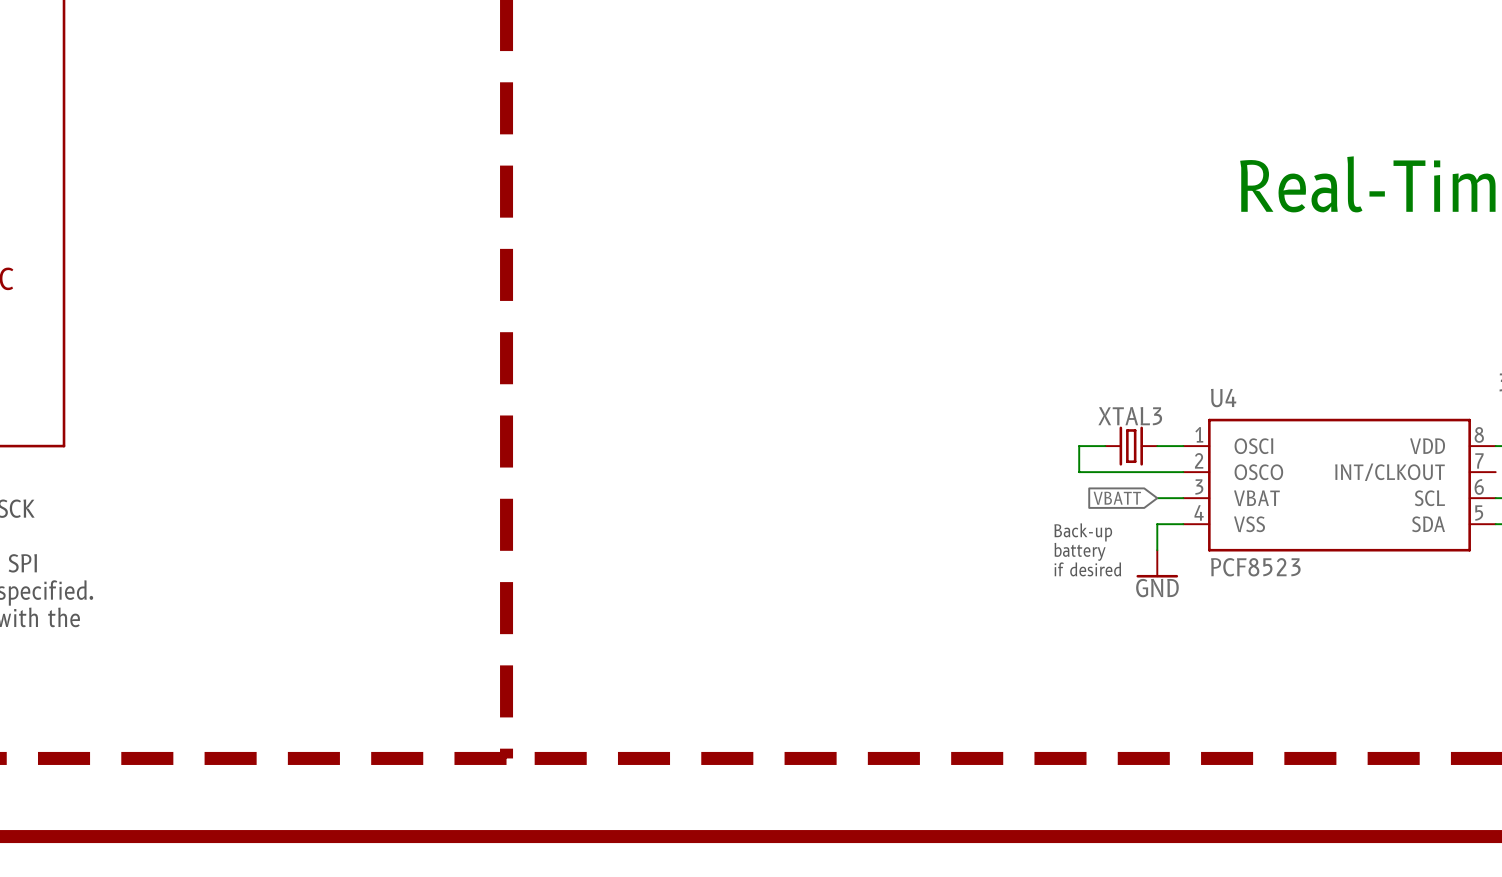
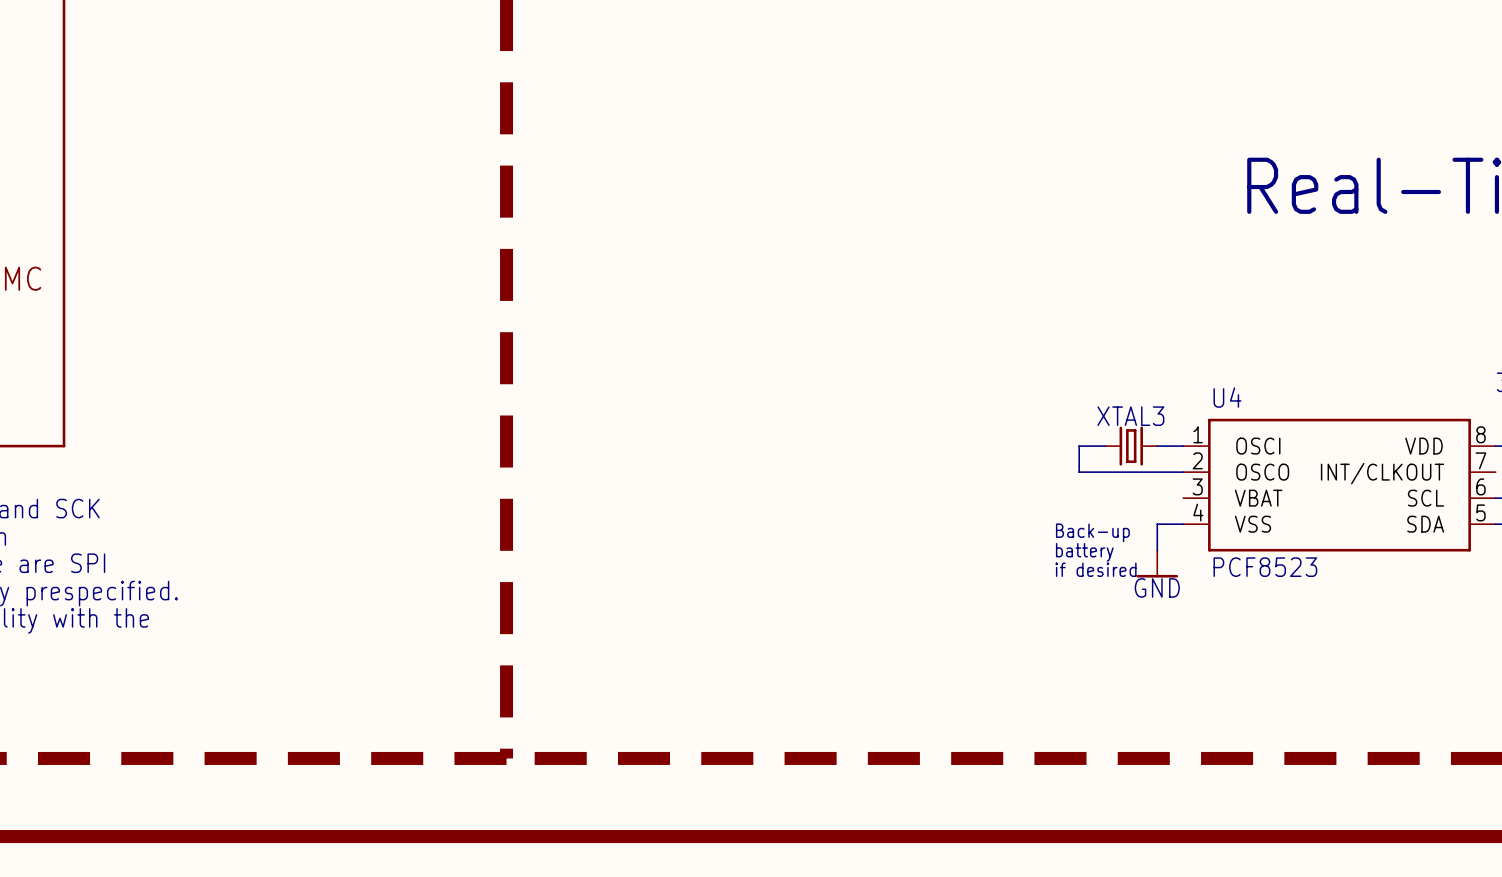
global label: VBATT (1117, 498) -> none
wire: (1157, 498) (1183, 498) -> none

